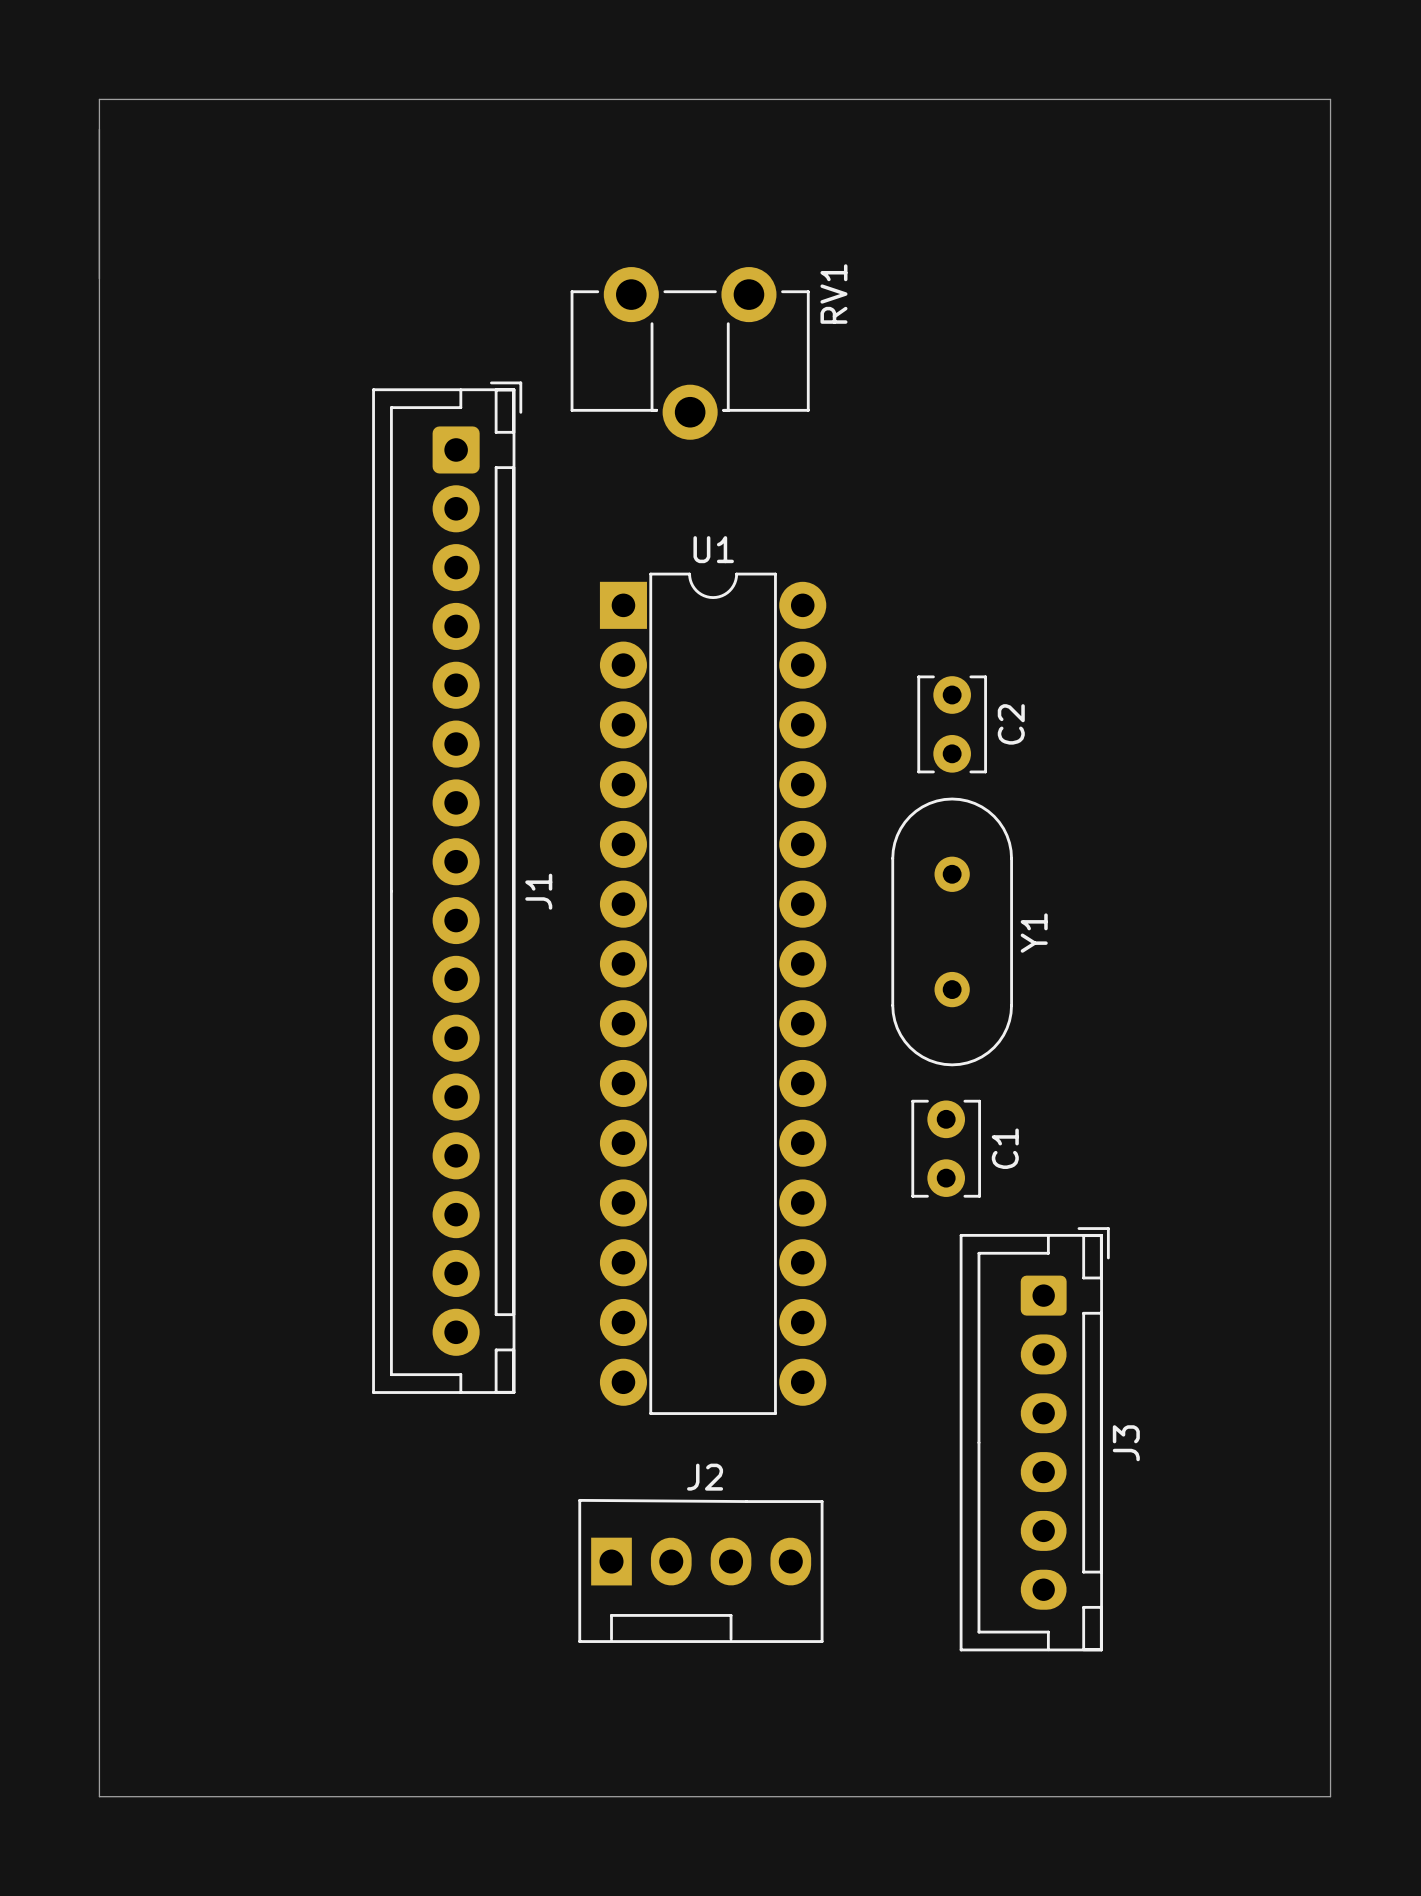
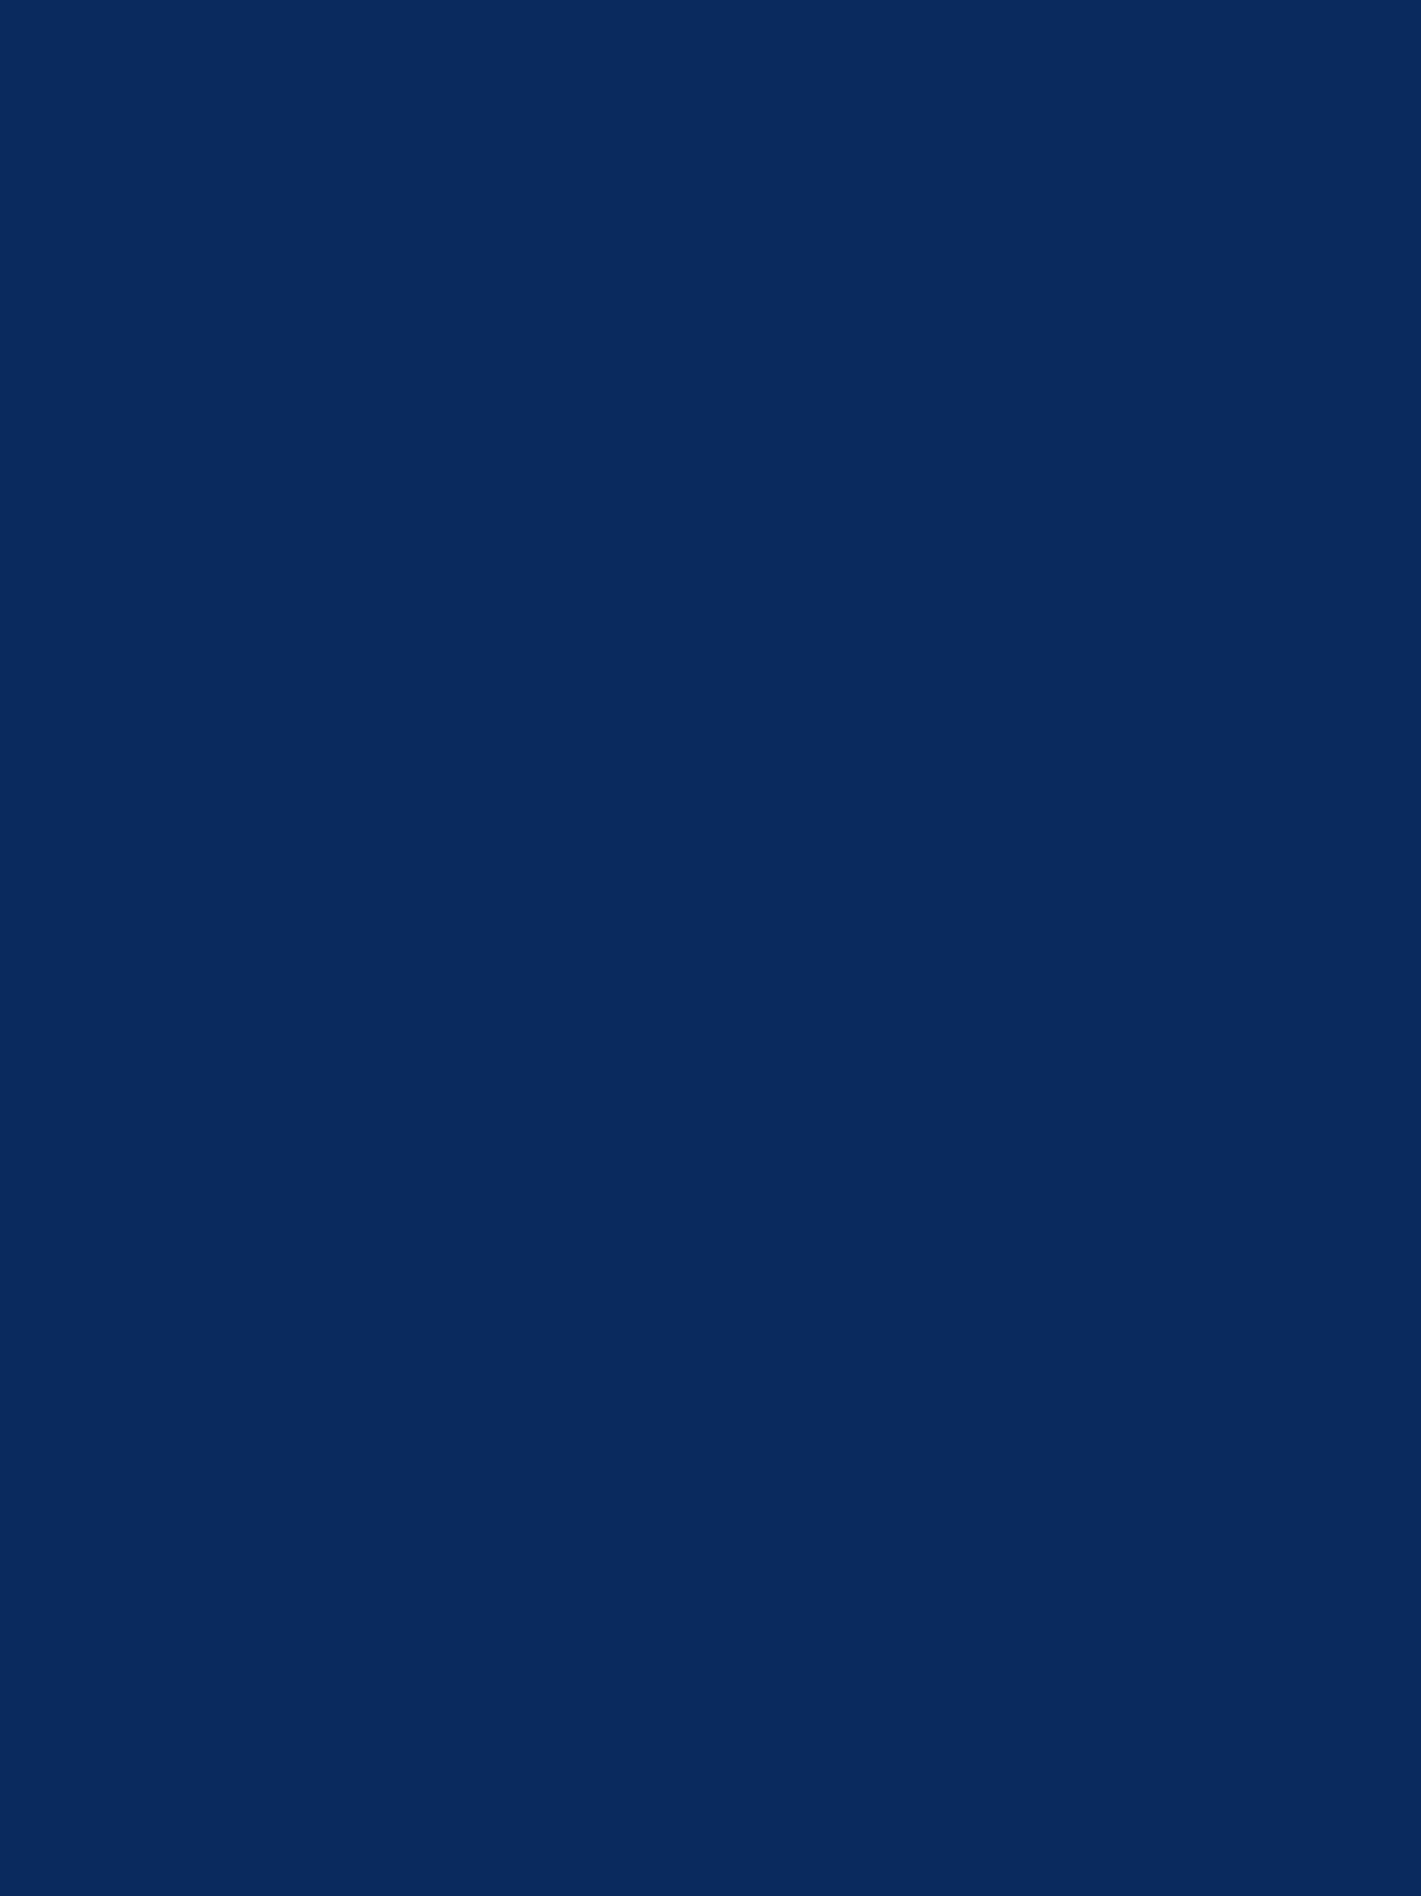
board edge: (99, 99) (99, 1796) (1330, 1796) (1330, 99) (99, 99) -> none
RV1: (690, 353) -> none
C2: (952, 724) -> none
J1: (447, 887) -> none
Y1: (952, 931) -> none
U1: (713, 993) -> none
C1: (946, 1148) -> none
J3: (1034, 1439) -> none
J2: (700, 1570) -> none

